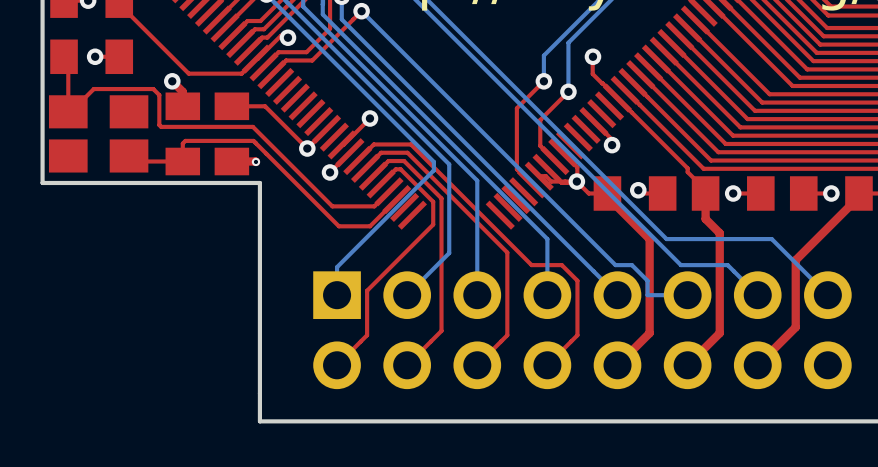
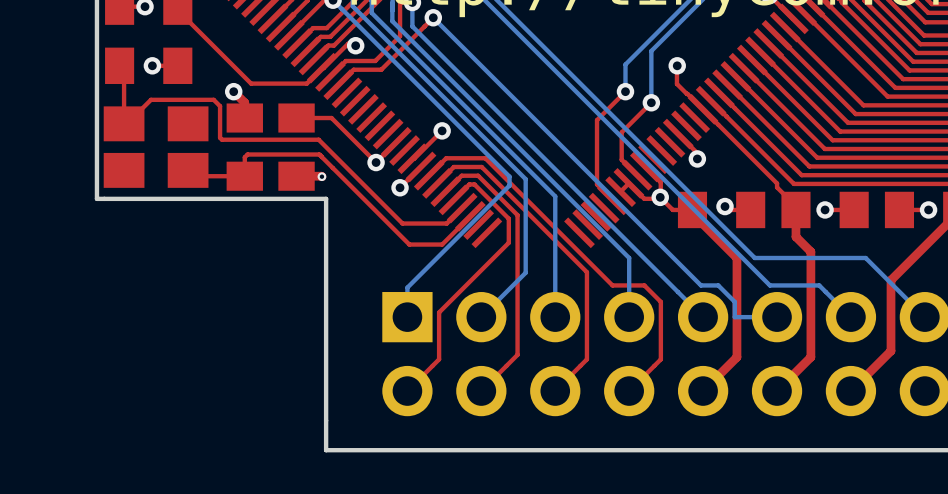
top track: (539, 176) (545, 176) (551, 181) (576, 181) -> (620, 191) (628, 183)

